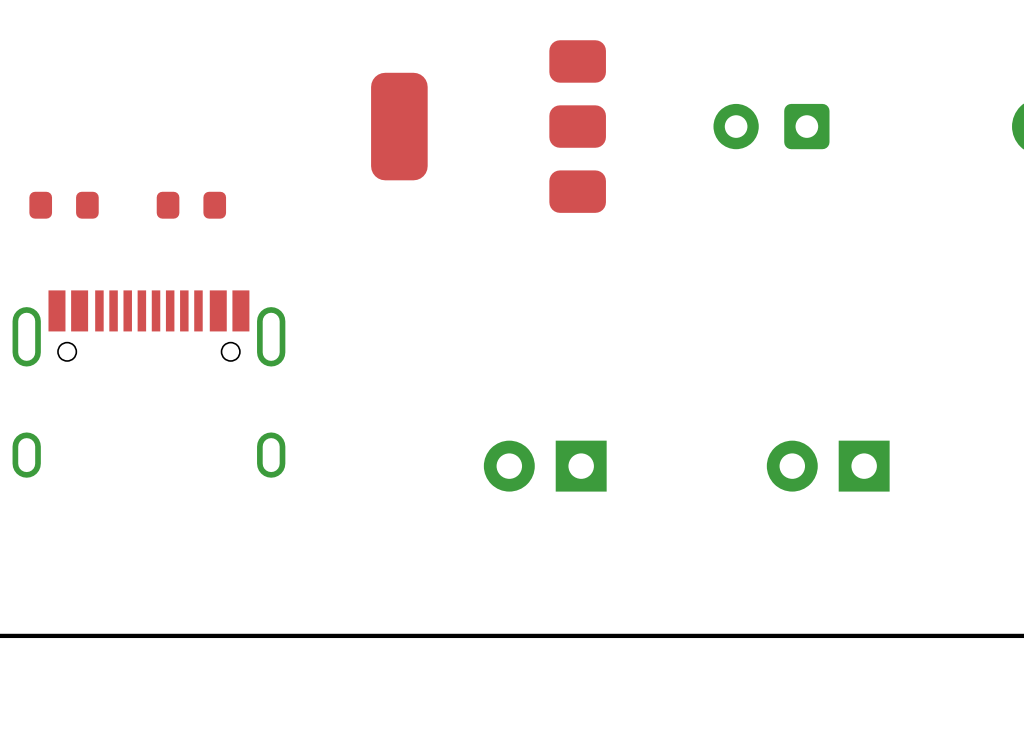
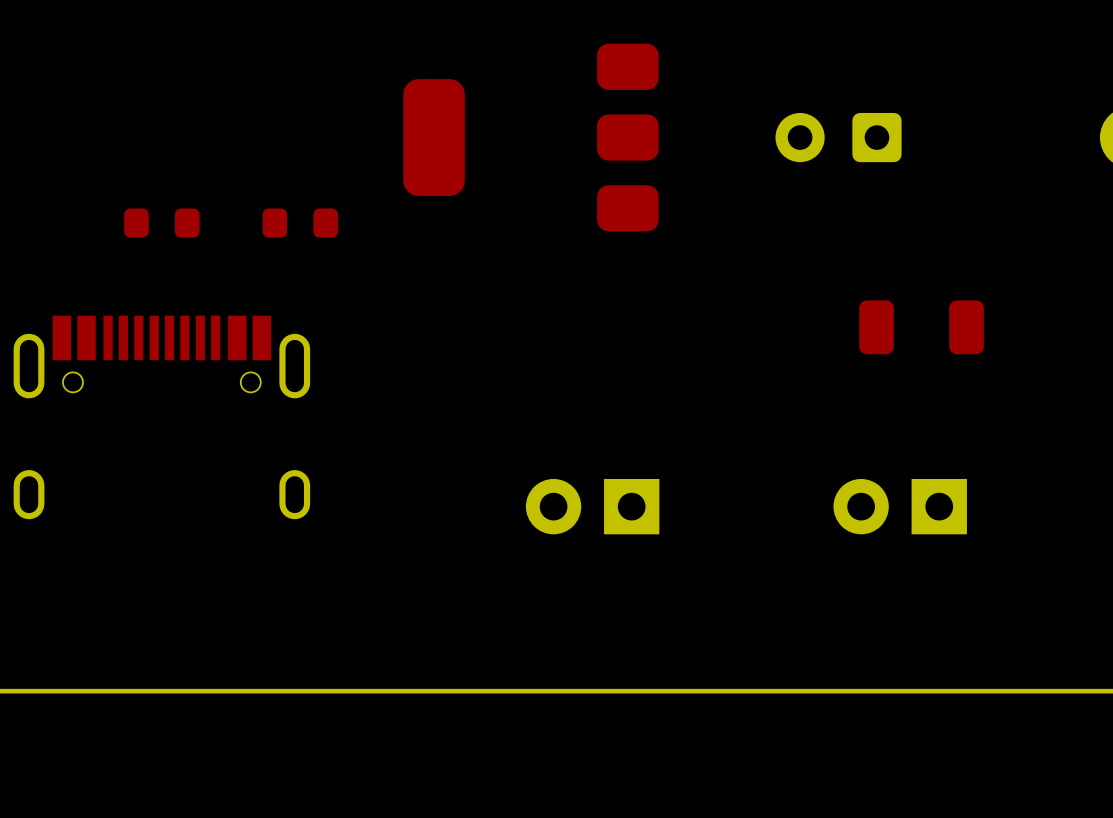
part: (64, 205) -> none
part: none -> (161, 223)
part: (191, 205) -> none
part: none -> (300, 223)
part: none -> (921, 327)

